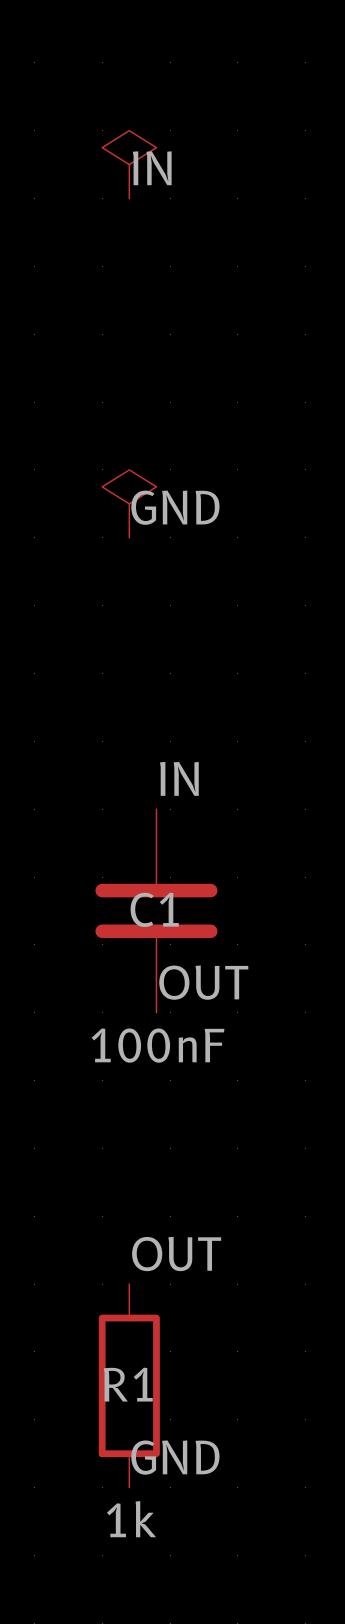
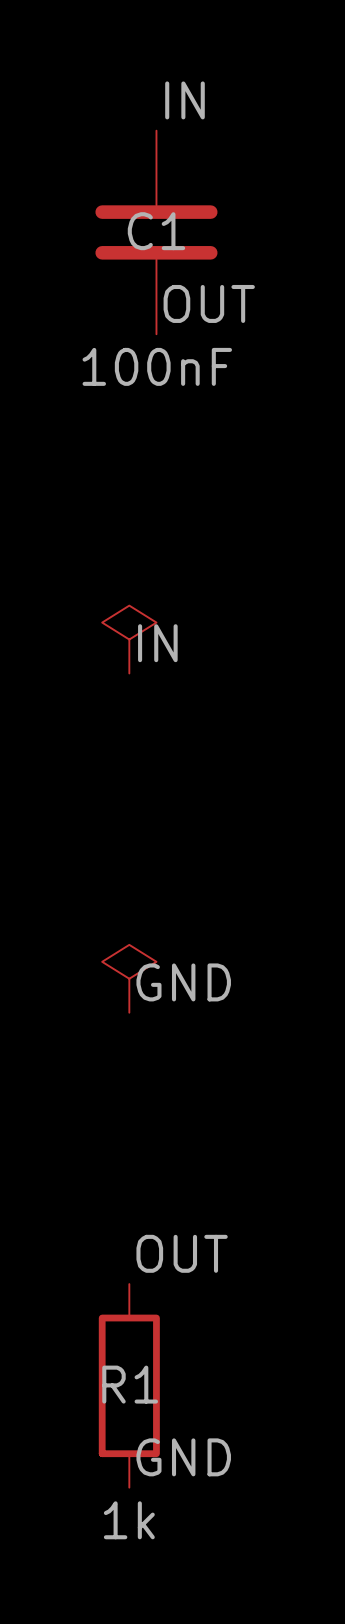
power symbol: (129, 164) -> none
label position: IN (152, 168) -> IN (184, 100)
label: none -> OUT (209, 303)
power symbol position: (129, 503) -> (129, 639)
label position: GND (175, 507) -> GND (183, 982)
label position: IN (179, 778) -> IN (157, 643)
C1 position: (156, 910) -> (156, 232)
power symbol: none -> (129, 978)
label: OUT (203, 982) -> none

